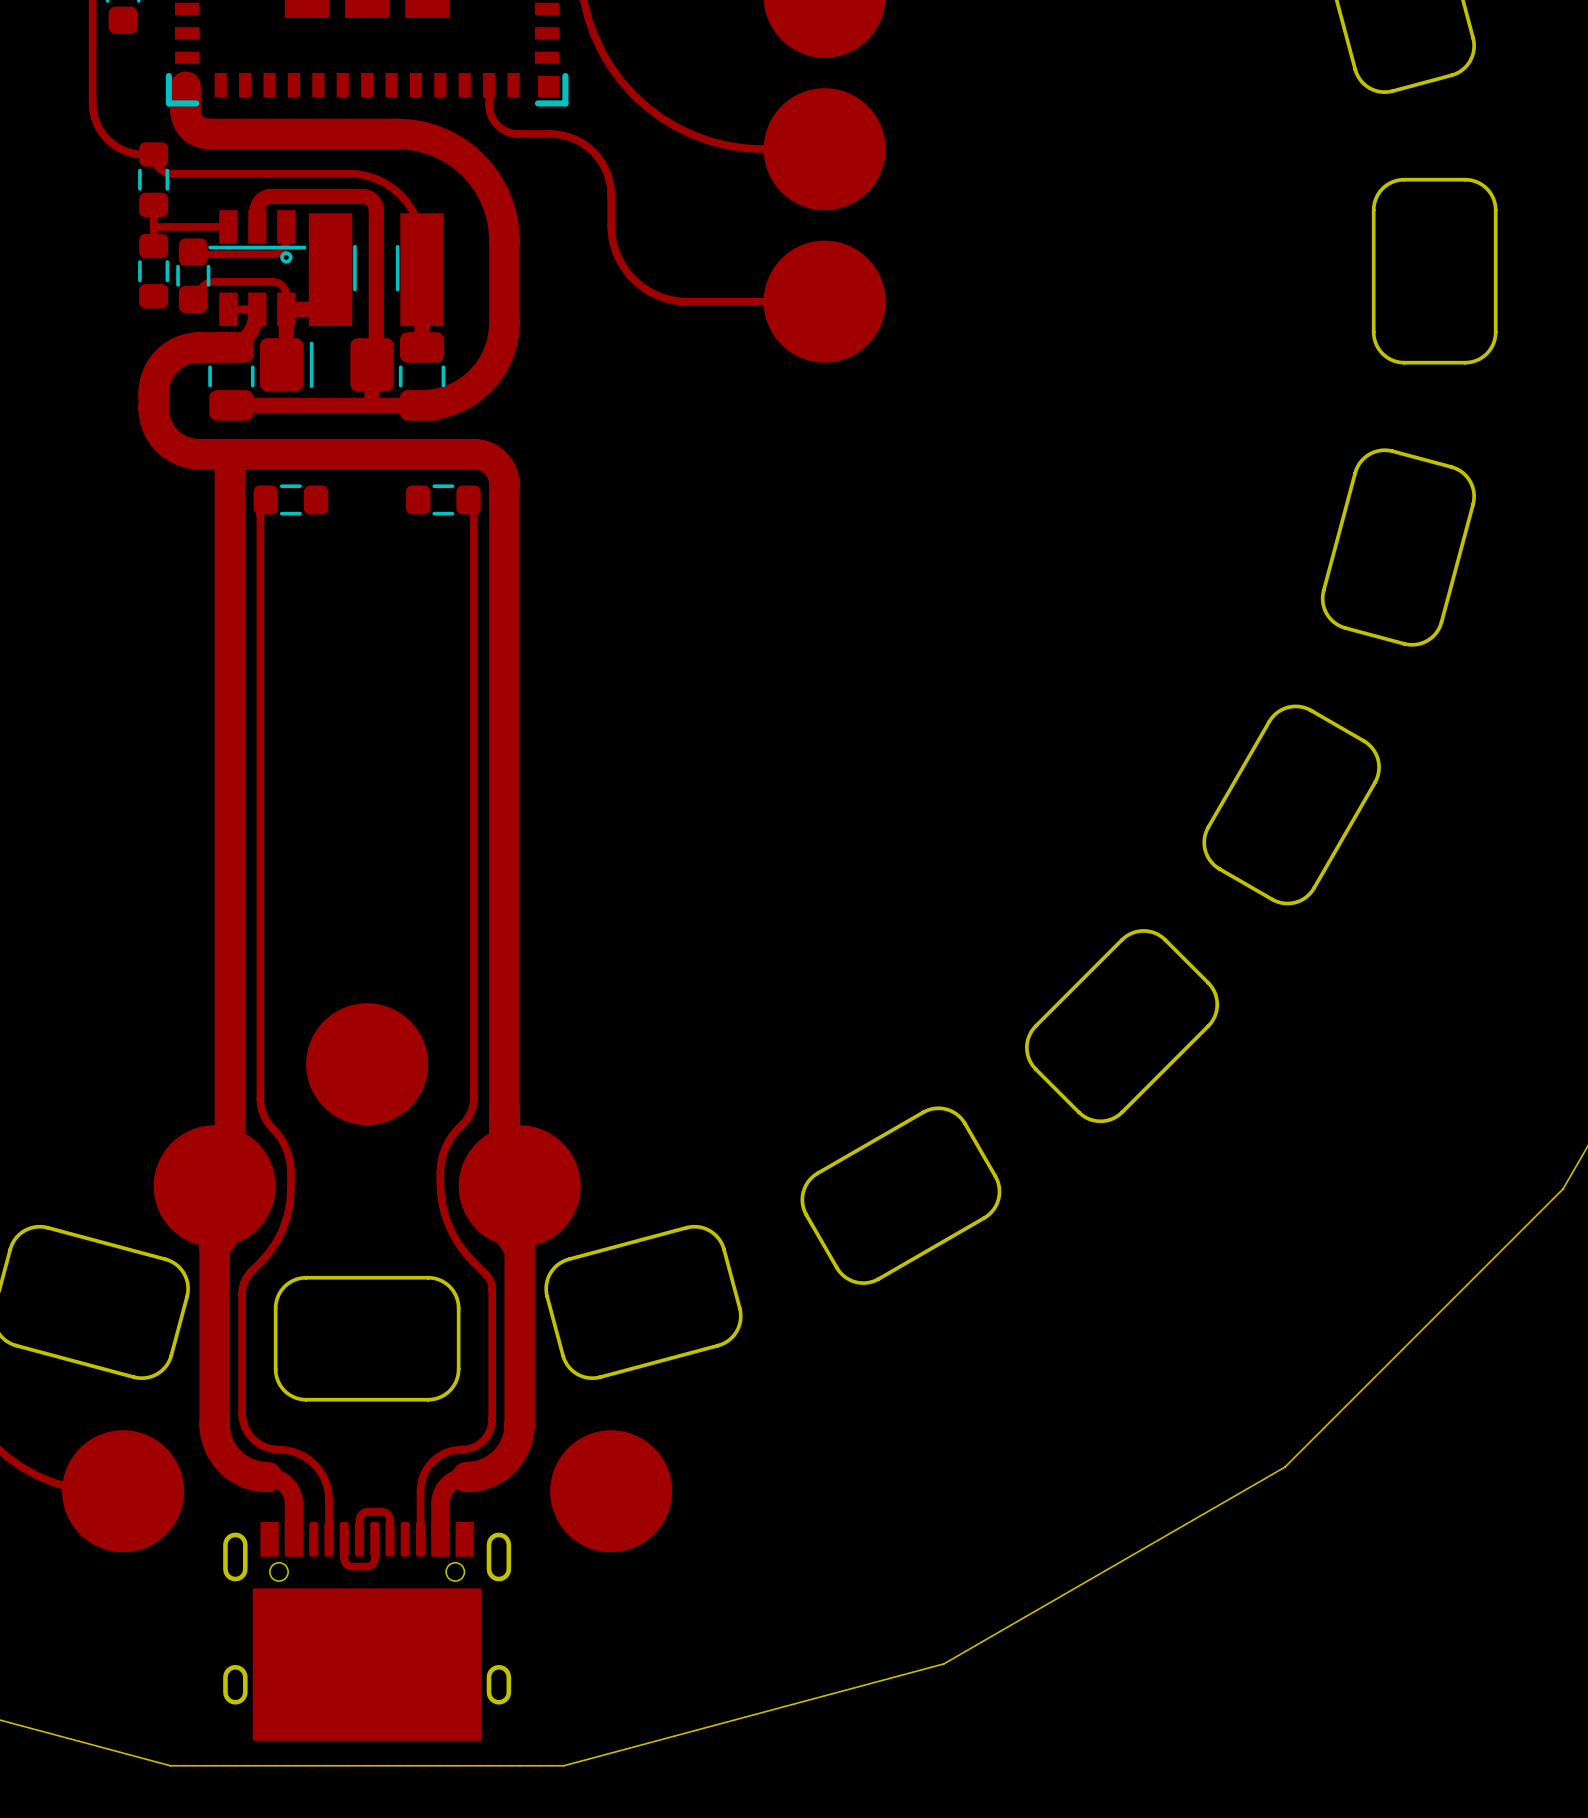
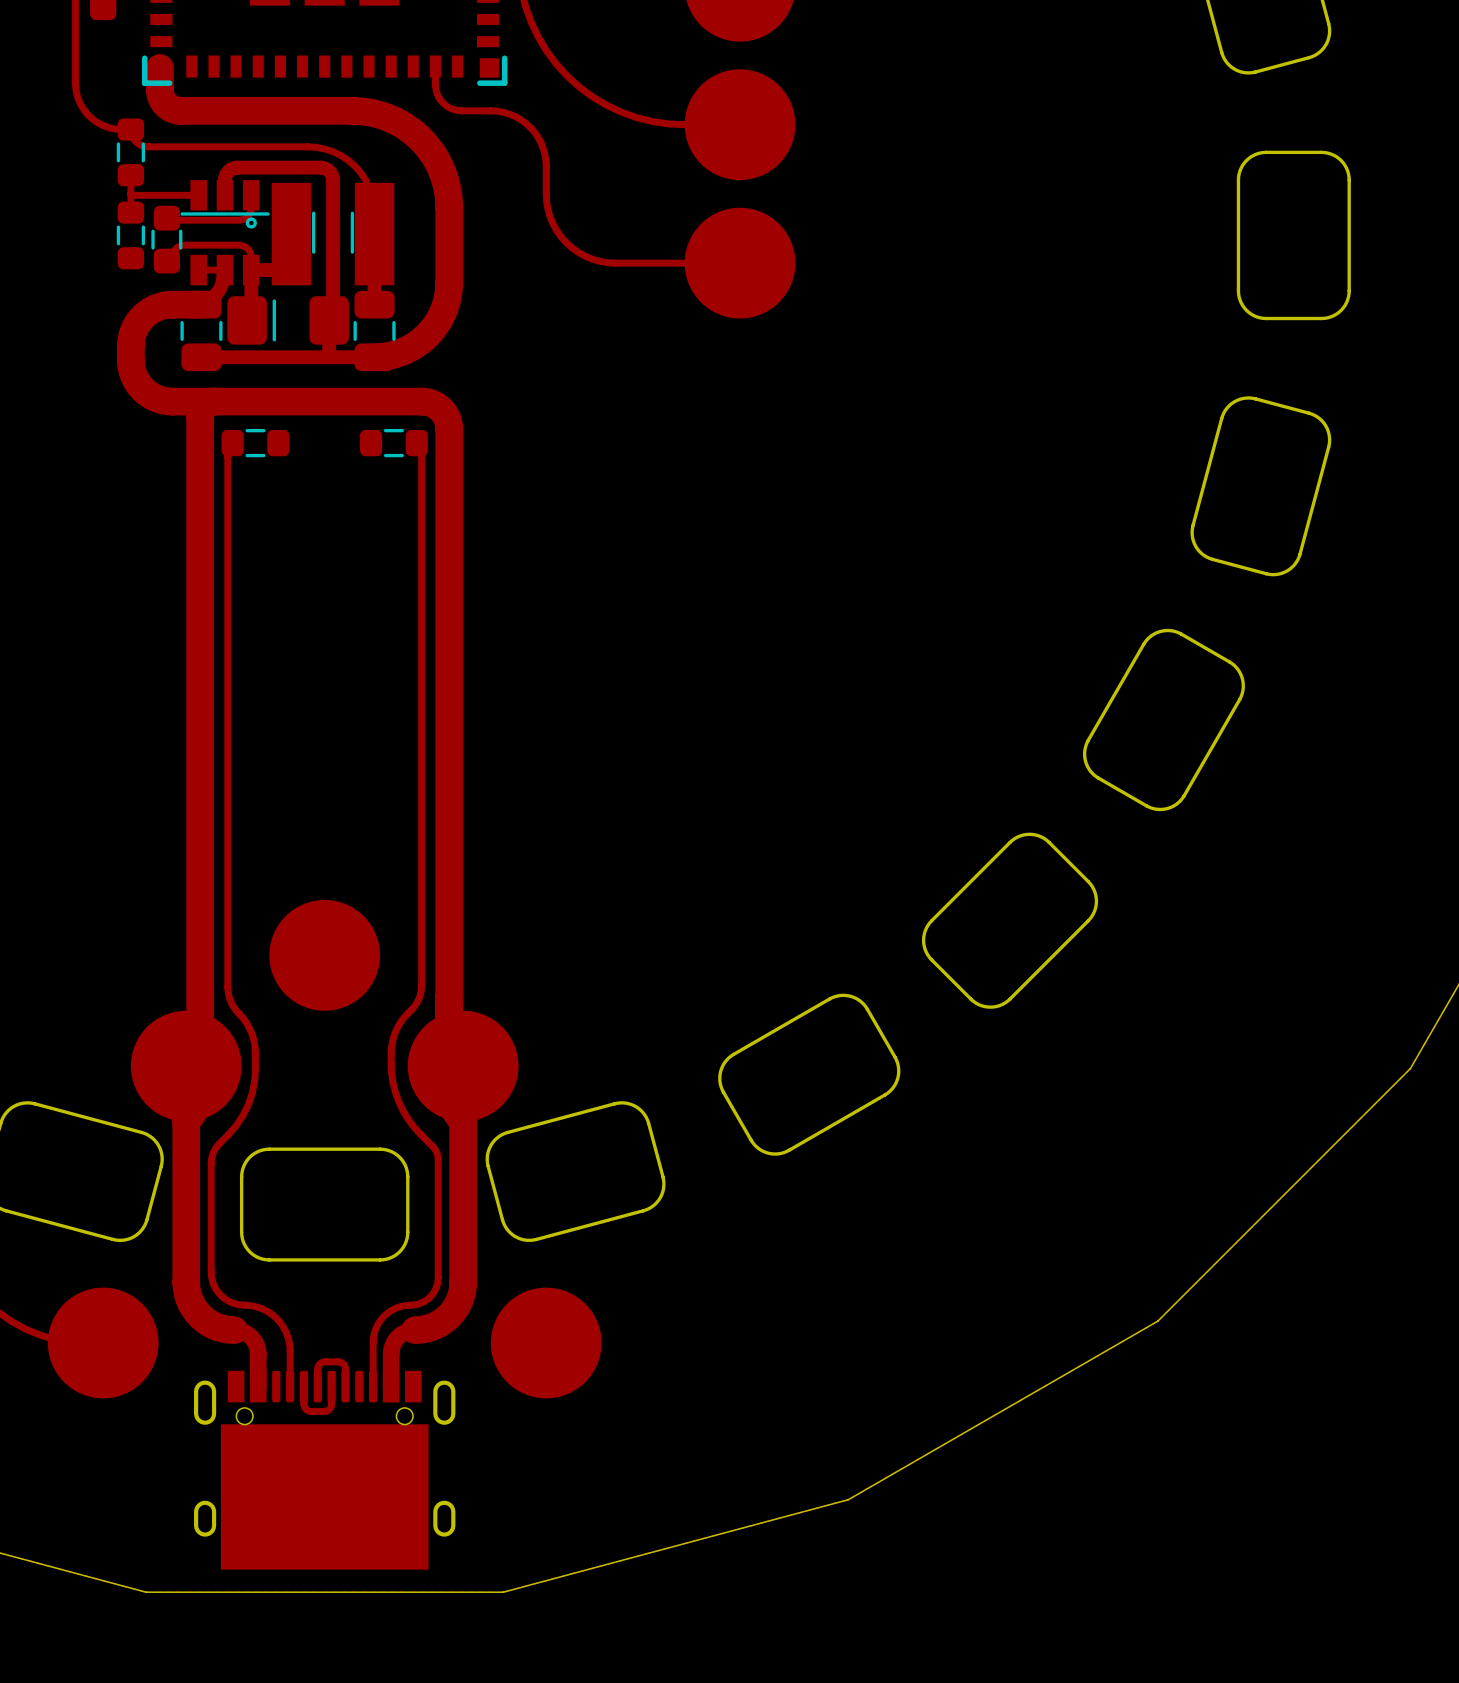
part footprint: [223, 1521, 512, 1741] -> [194, 1370, 456, 1570]

